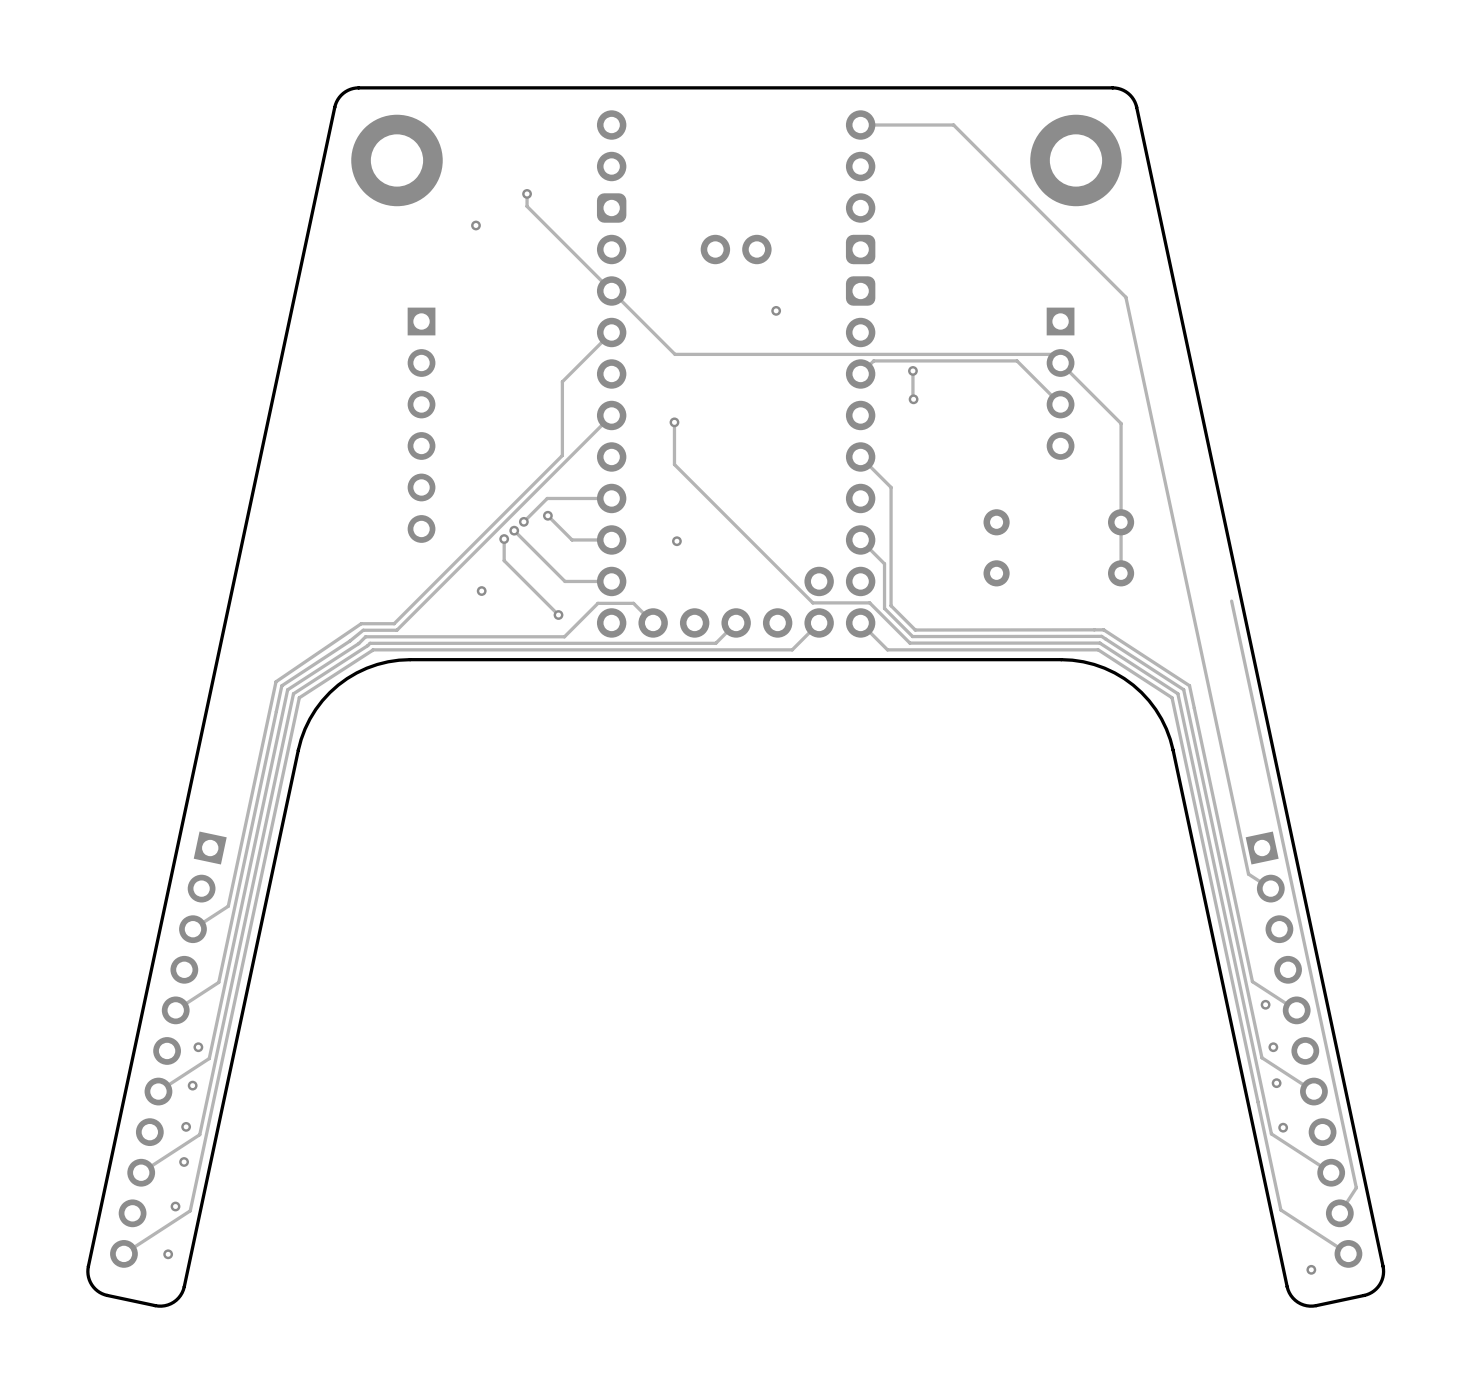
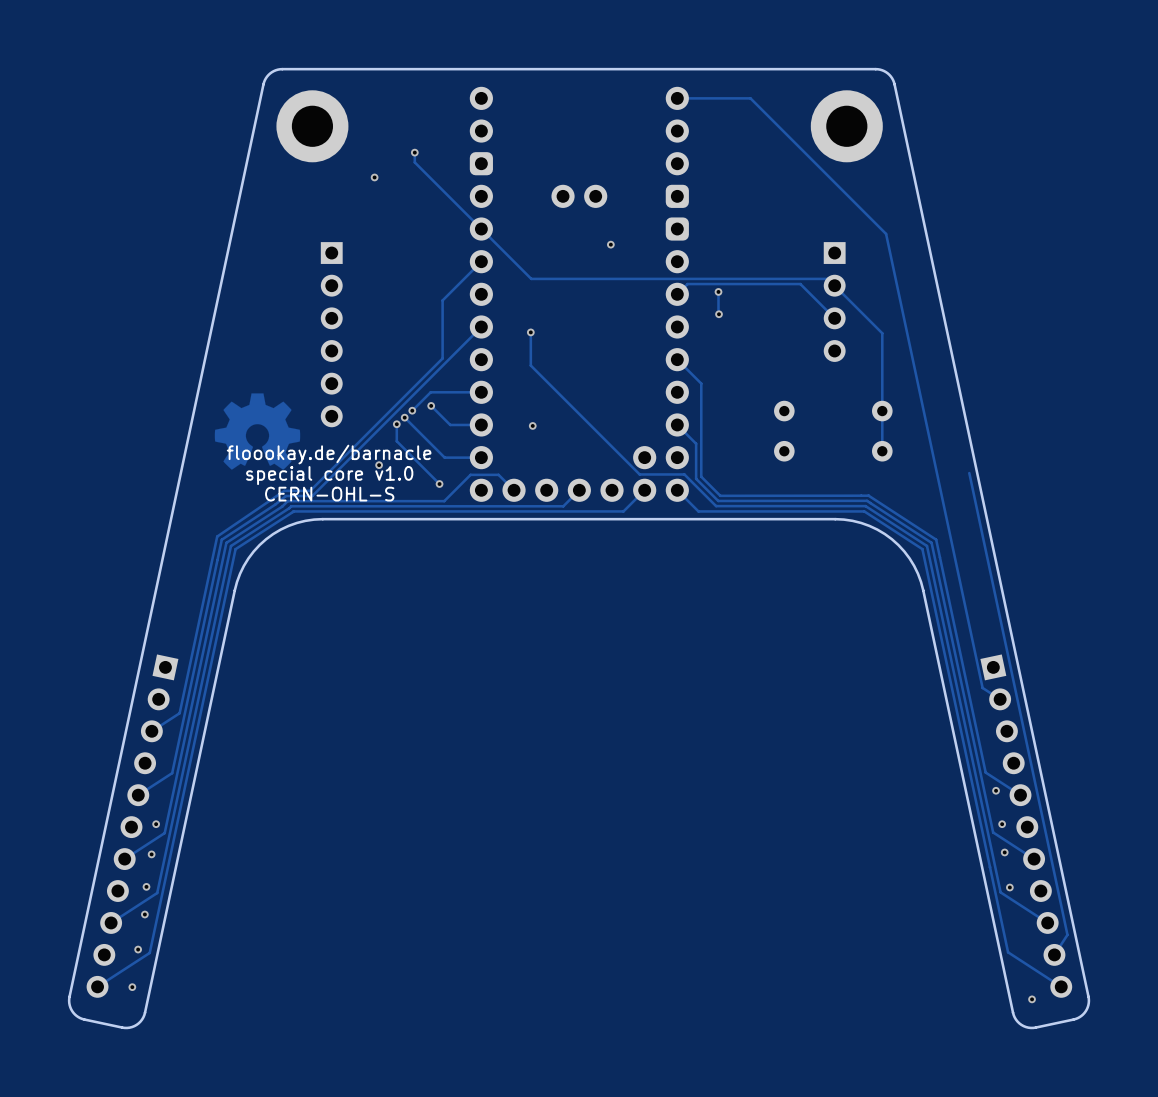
drawing: none -> [214, 393, 301, 470]
text: none -> floookay.de/barnacle (329, 454)
text: none -> special core v1.0 (329, 475)
text: none -> CERN-OHL-S (329, 494)

